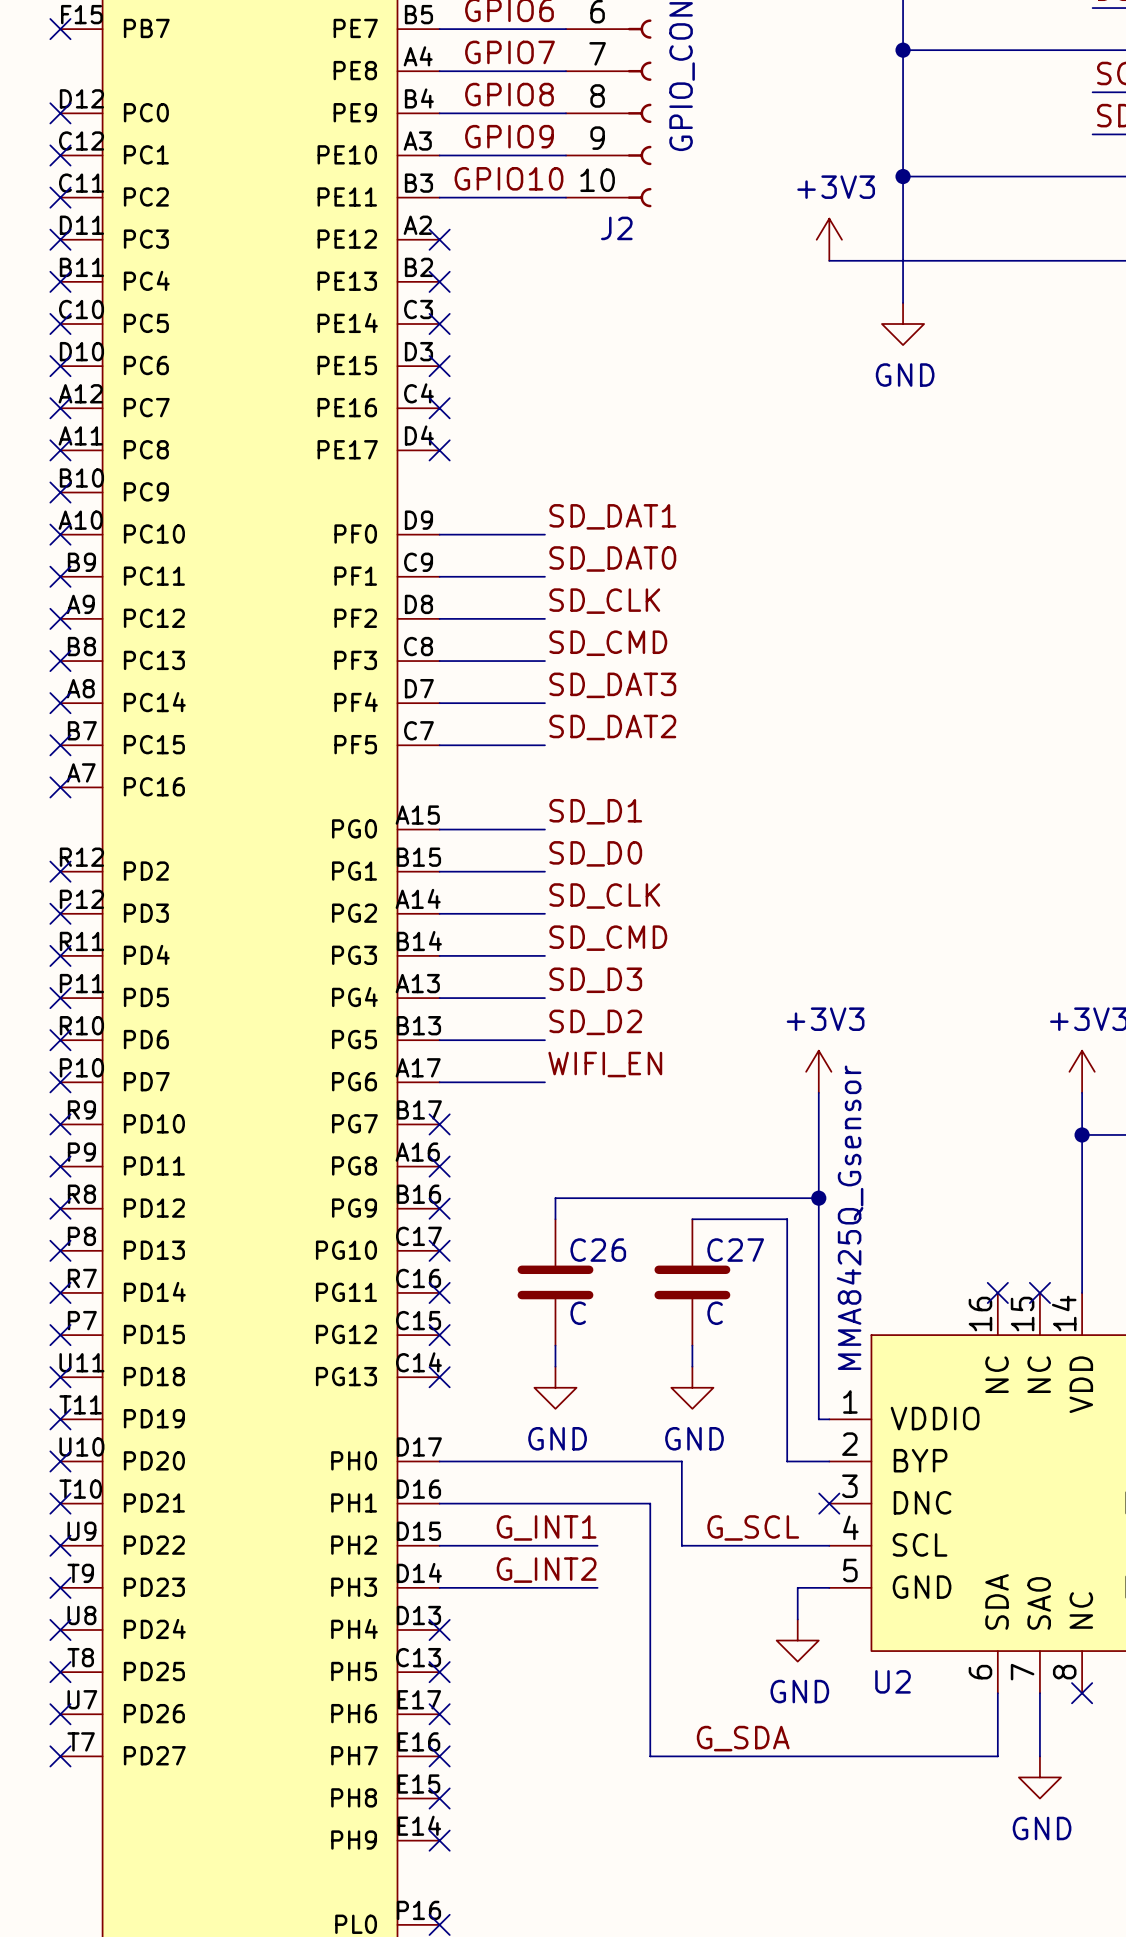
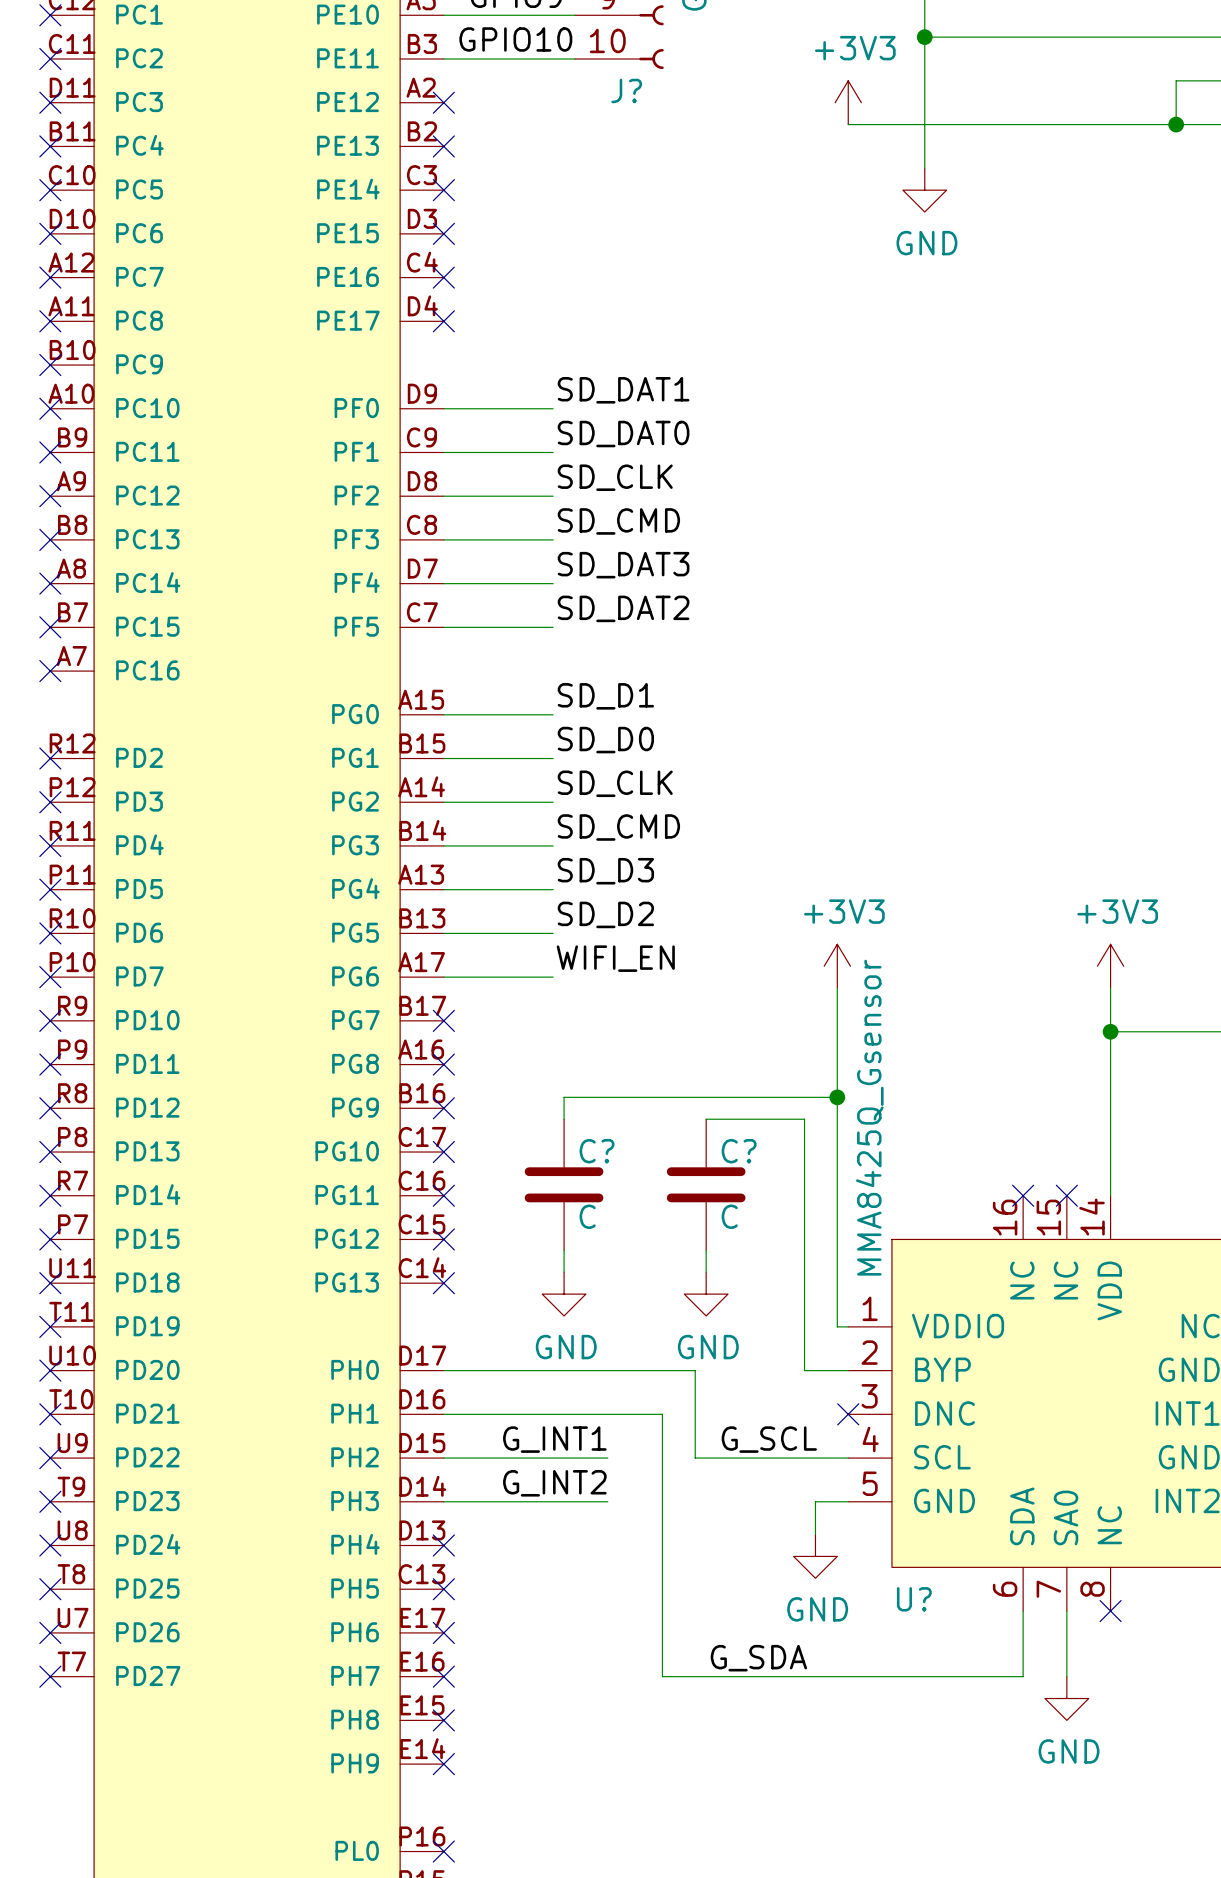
J2 name: J2 (616, 228) -> J? (626, 90)
C26 name: C26 (598, 1250) -> C? (597, 1151)
C27 name: C27 (735, 1250) -> C? (739, 1151)
U2 name: U2 (893, 1681) -> U? (914, 1599)

